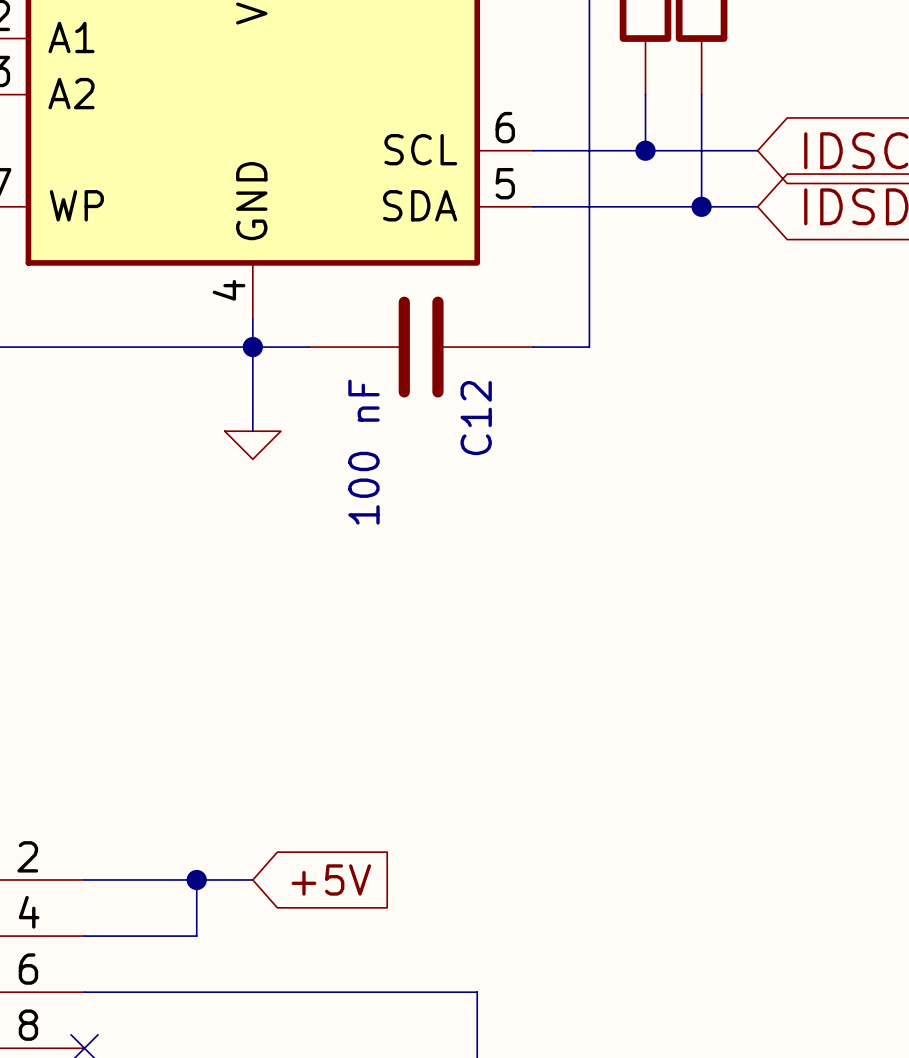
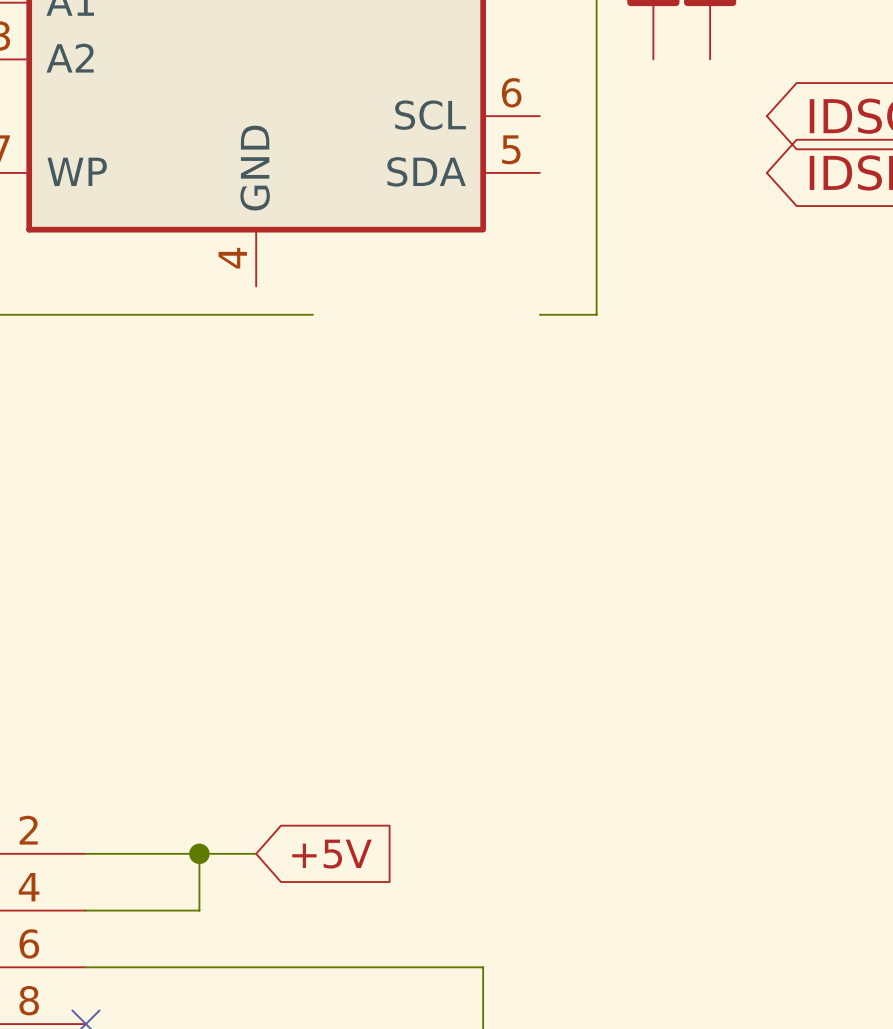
wire: (645, 94) (645, 150) -> none
wire: (701, 94) (701, 206) -> none
wire: (533, 150) (757, 150) -> none
junction: (645, 150) -> none
wire: (533, 206) (757, 206) -> none
junction: (701, 206) -> none
wire: (252, 319) (252, 431) -> none
junction: (252, 347) -> none
C12: 100 nF (421, 347) -> none
power symbol: (252, 445) -> none

